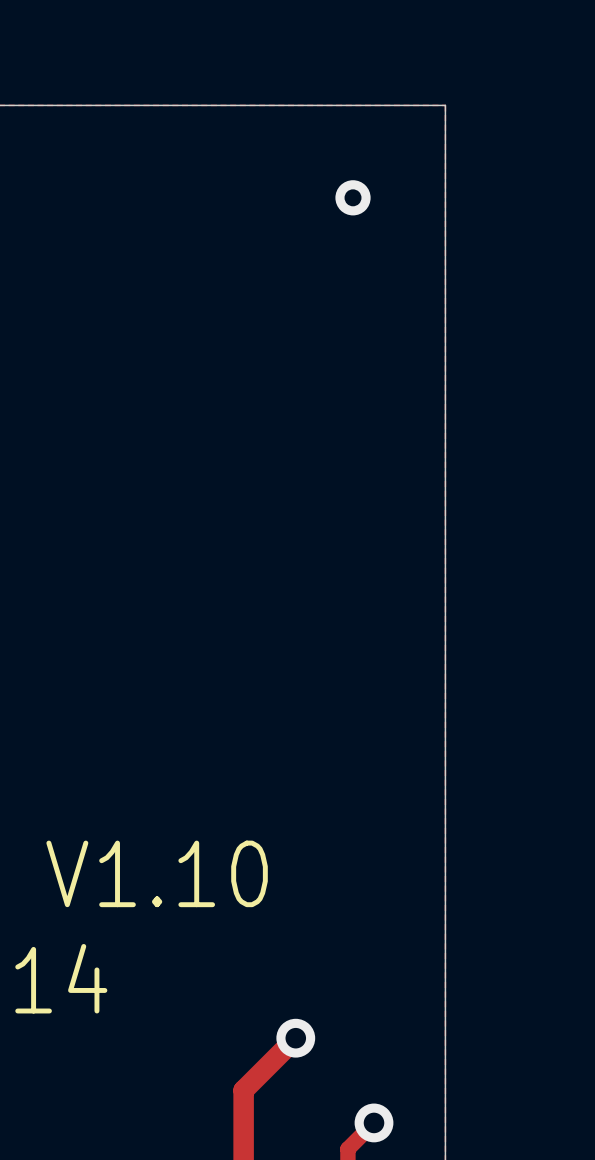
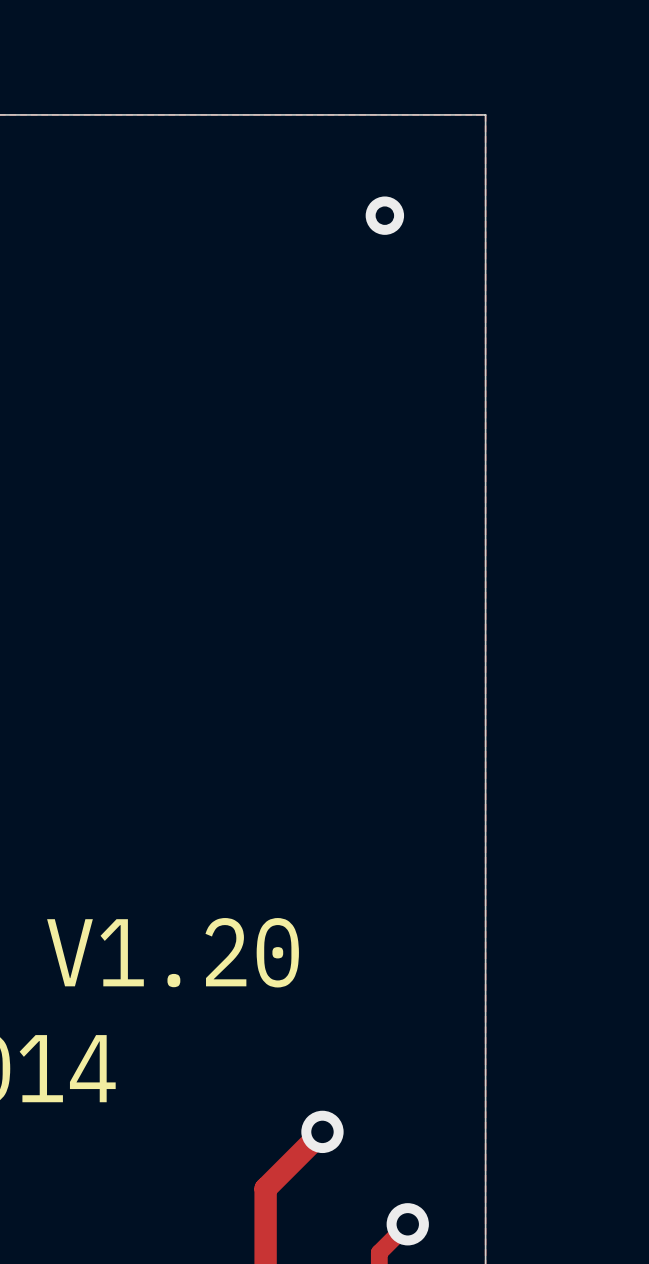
text: V1.10 (157, 873) -> V1.20 (173, 952)

